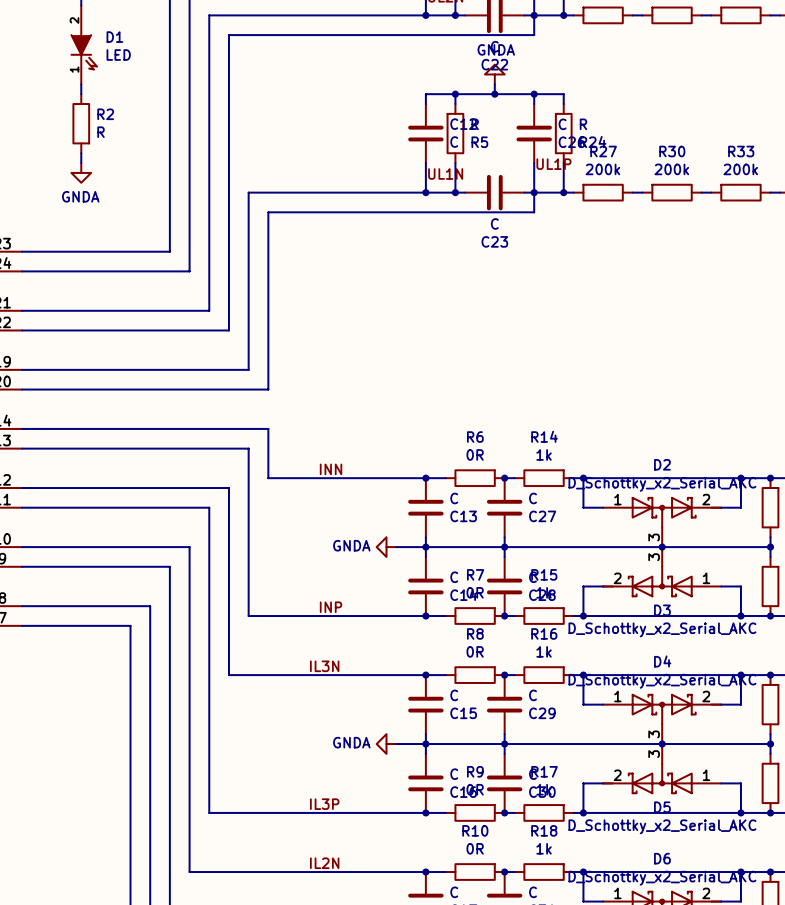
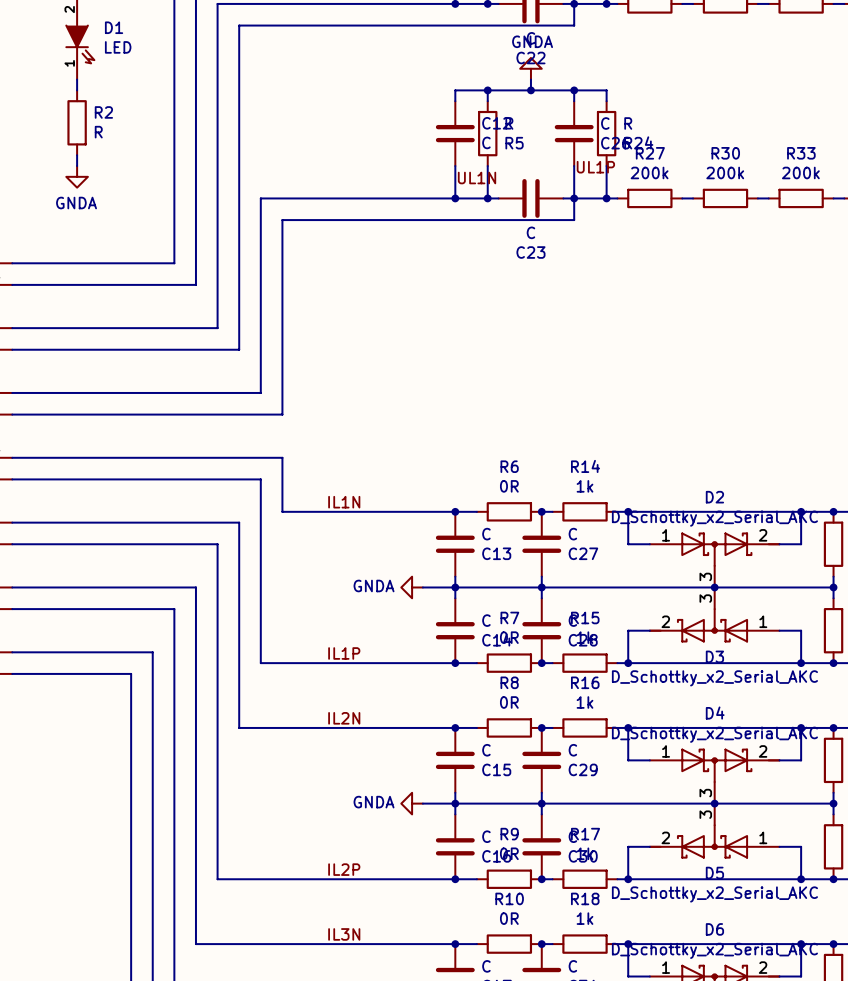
label: none -> IL1N (344, 502)
label: INN (331, 469) -> none
label: none -> IL1P (344, 653)
label: INP (331, 607) -> none
label: IL3N (324, 666) -> IL2N (344, 718)
label: IL3P (324, 804) -> IL2P (344, 869)
label: IL2N (324, 863) -> IL3N (344, 934)

